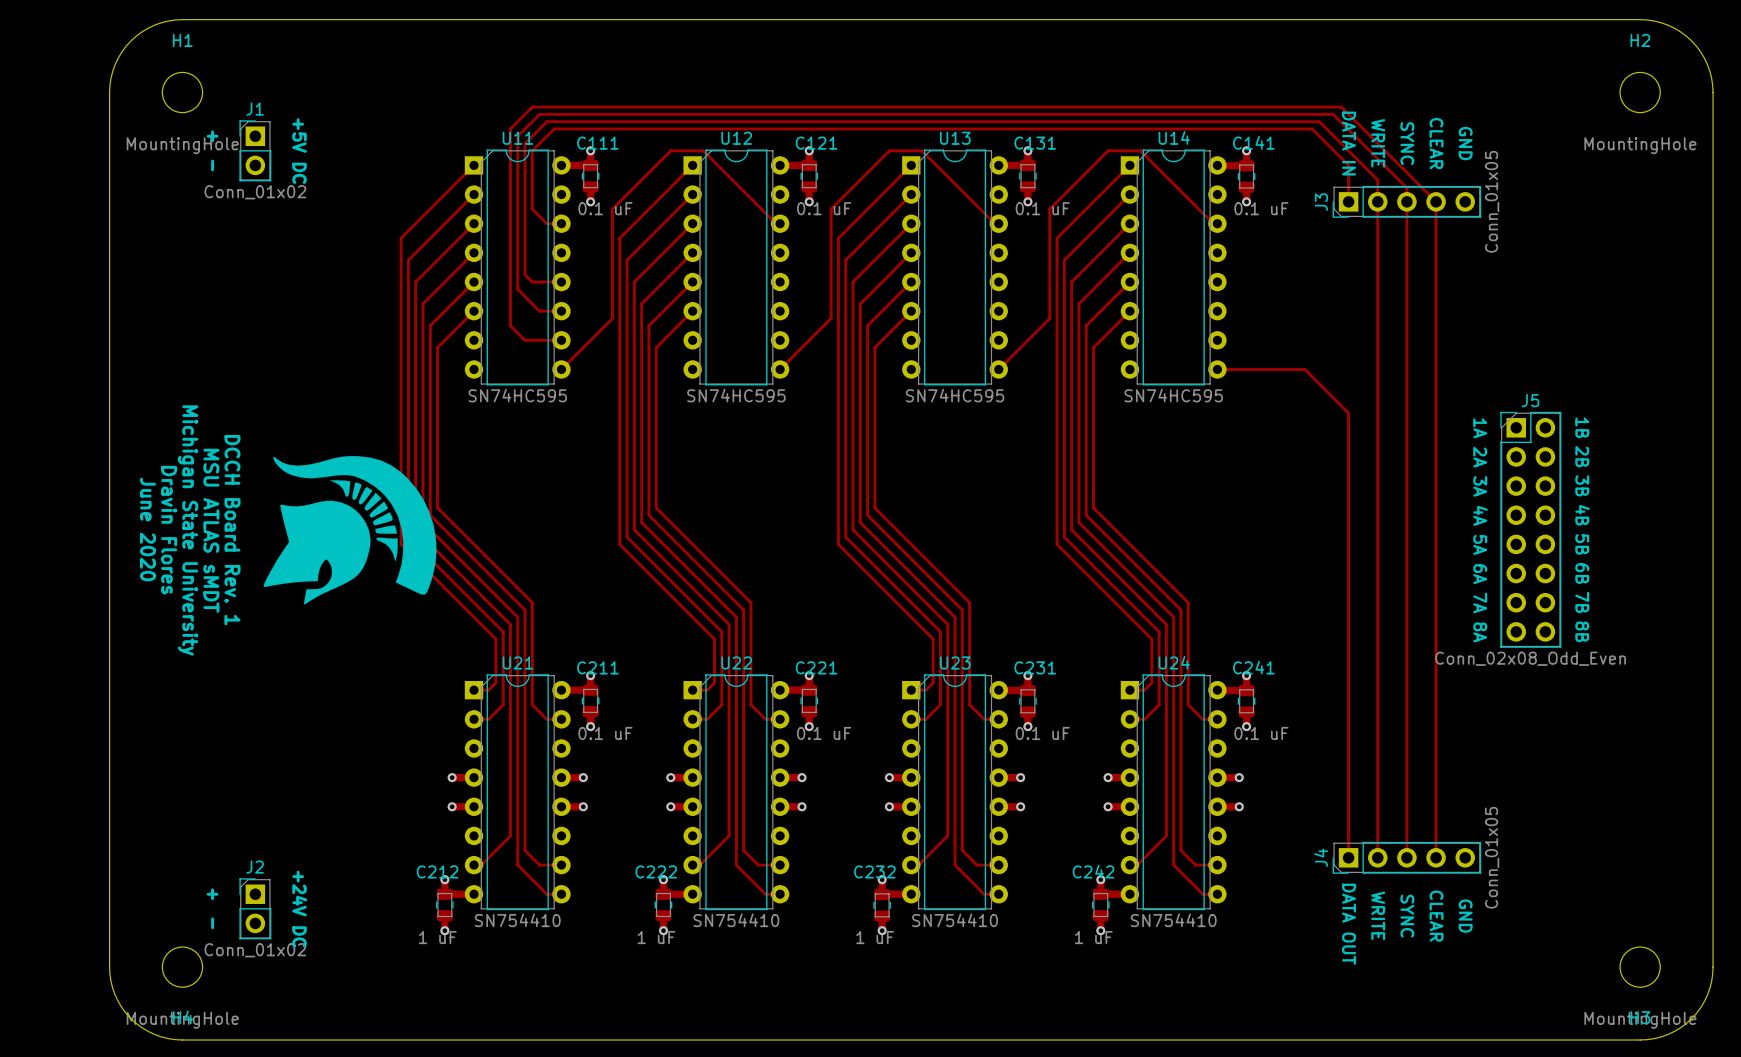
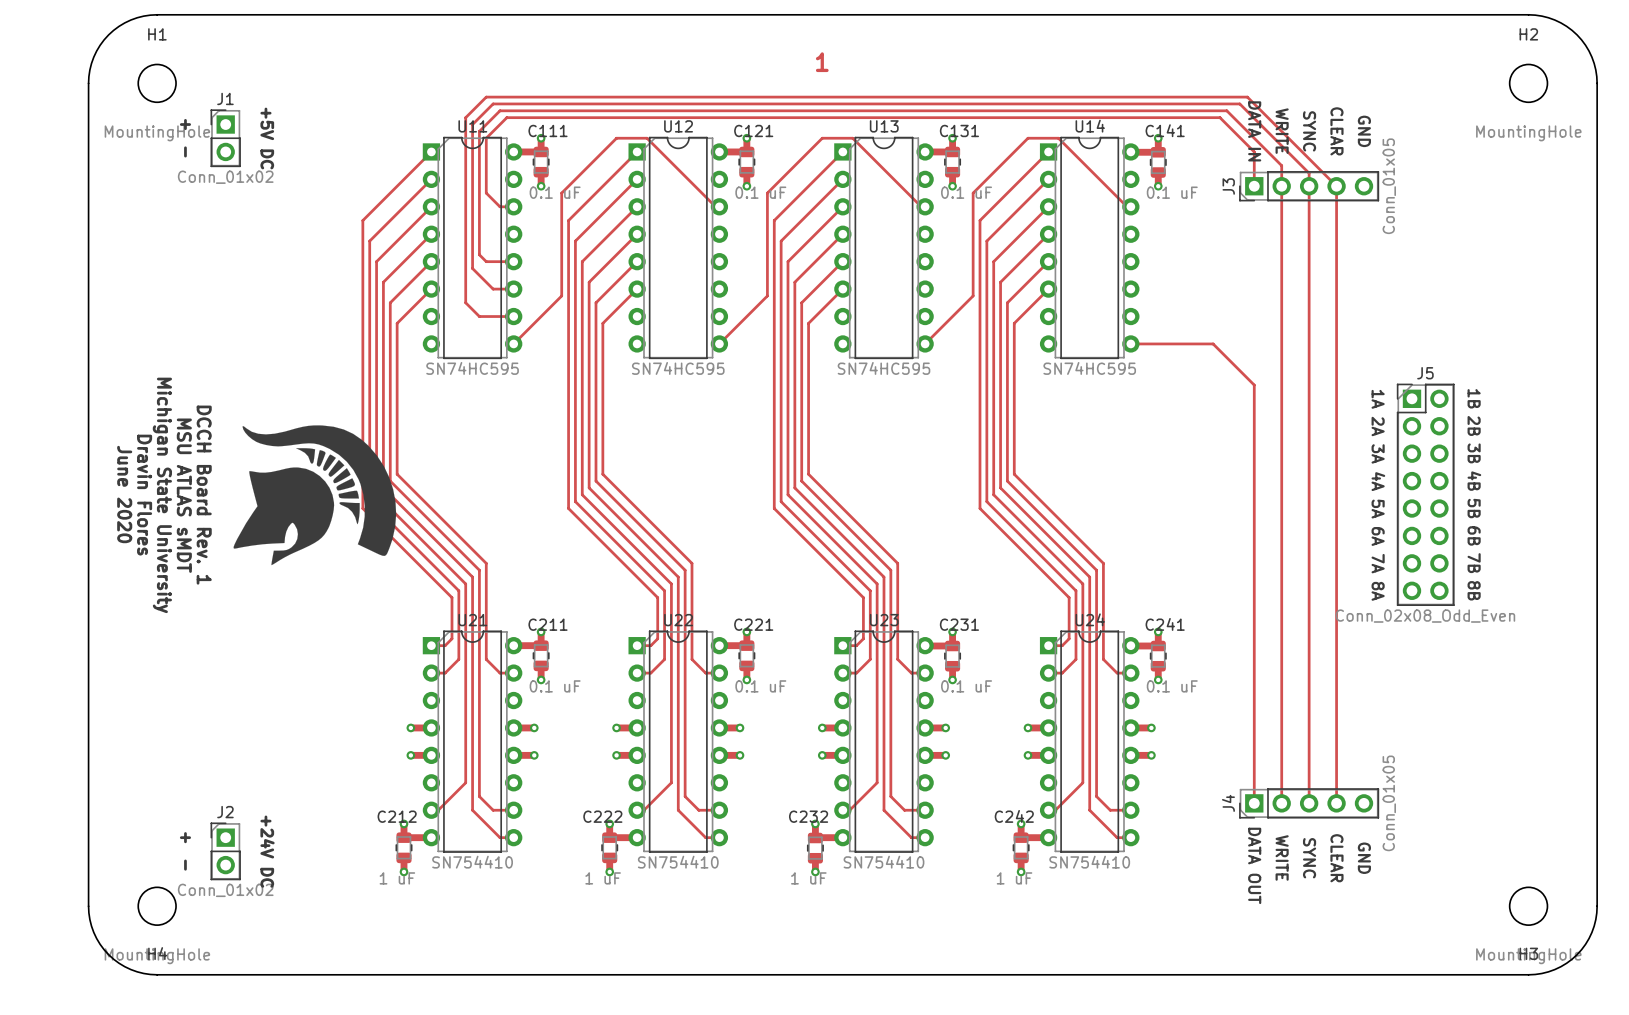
text: none -> 1 (822, 62)

